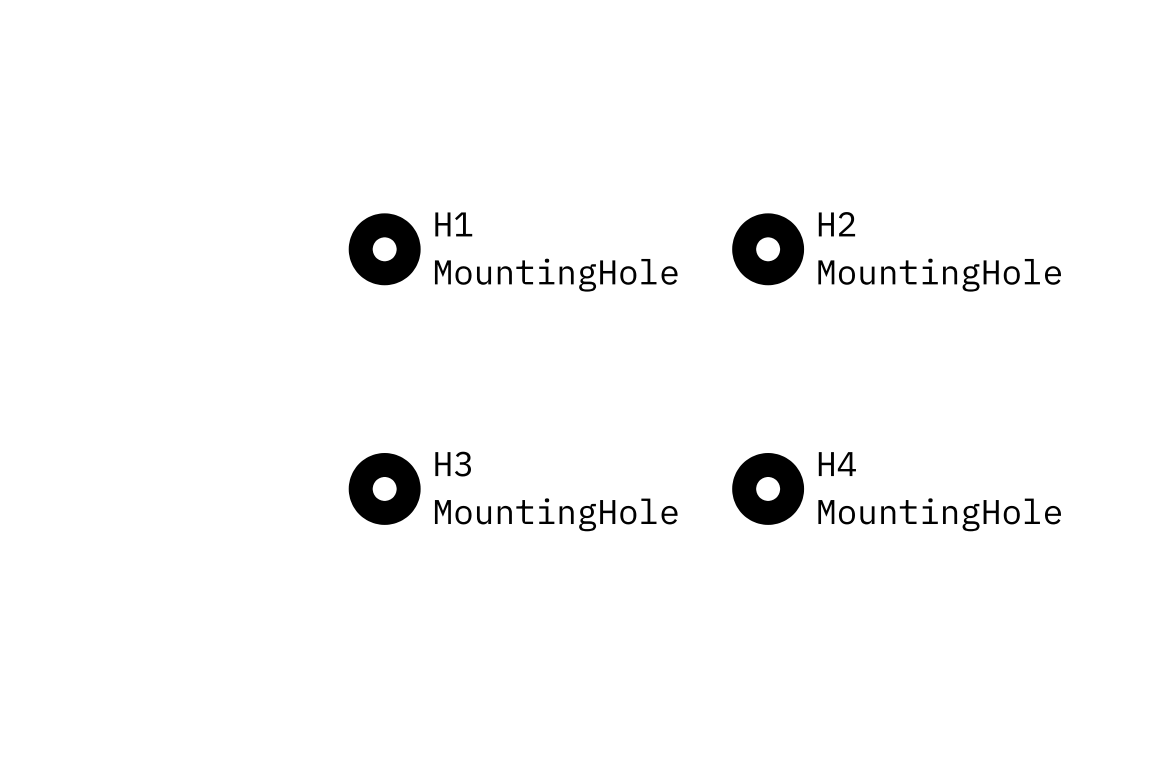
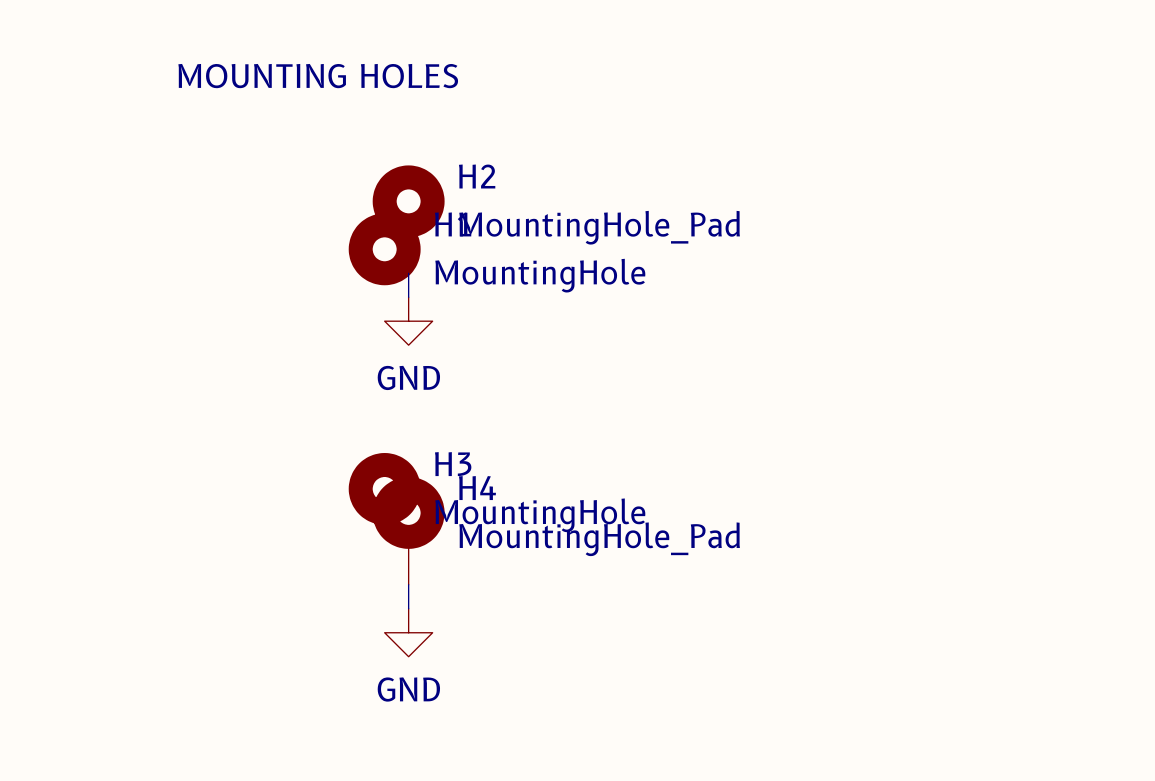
text: none -> MOUNTING HOLES (318, 76)
H2 symbol: [732, 213, 805, 286] -> [372, 165, 445, 274]
wire: none -> (408, 273) (408, 297)
H2 value: MountingHole (939, 275) -> MountingHole_Pad (599, 227)
power symbol: none -> GND (408, 321)
H4 symbol: [732, 453, 805, 525] -> [372, 476, 445, 585]
H4 value: MountingHole (939, 514) -> MountingHole_Pad (599, 539)
wire: none -> (408, 584) (408, 608)
power symbol: none -> GND (408, 632)

